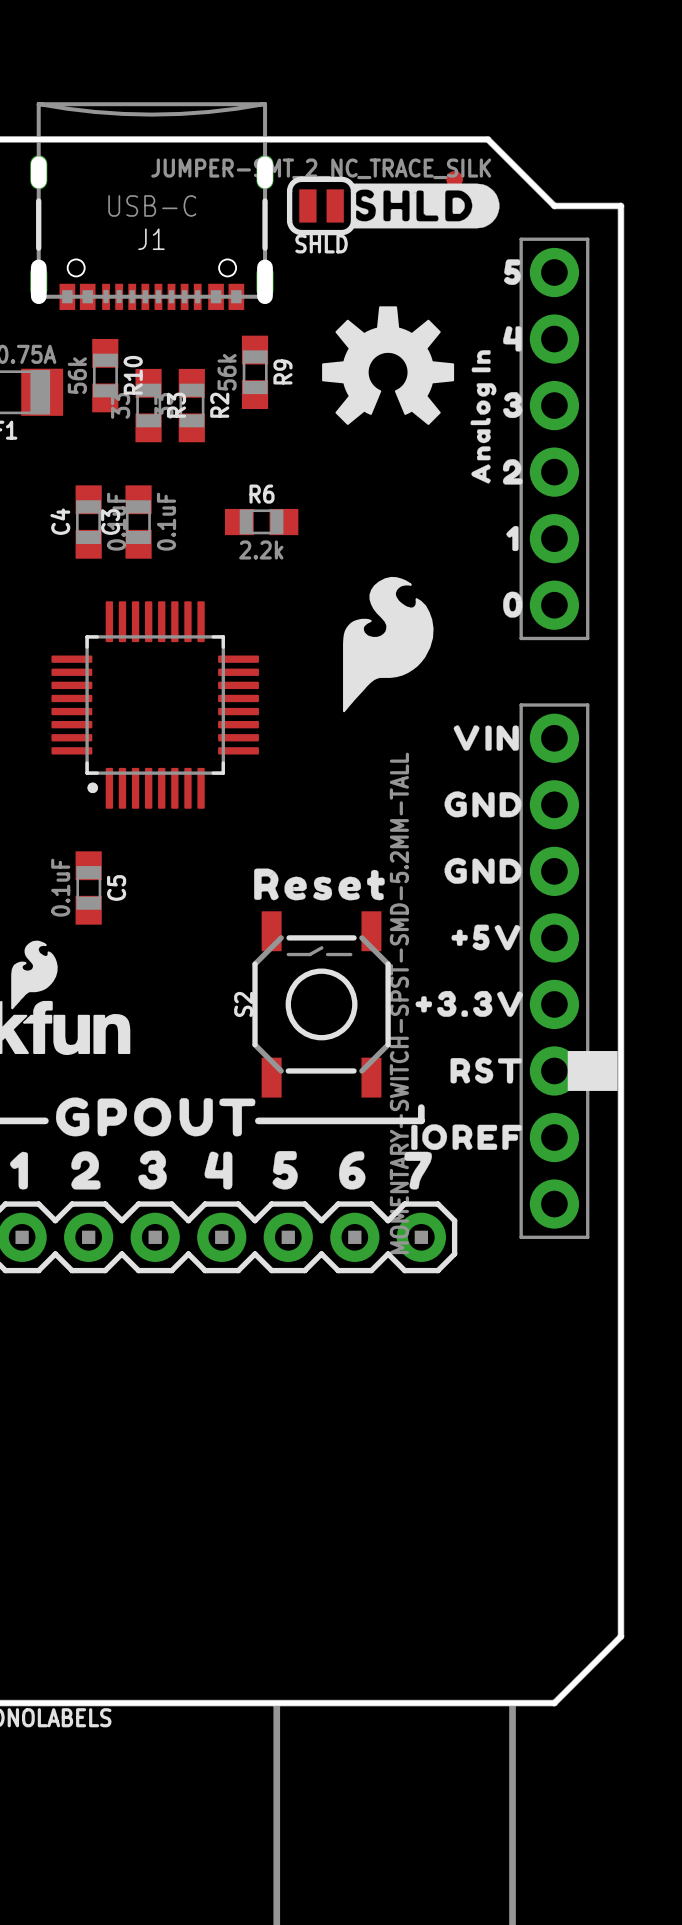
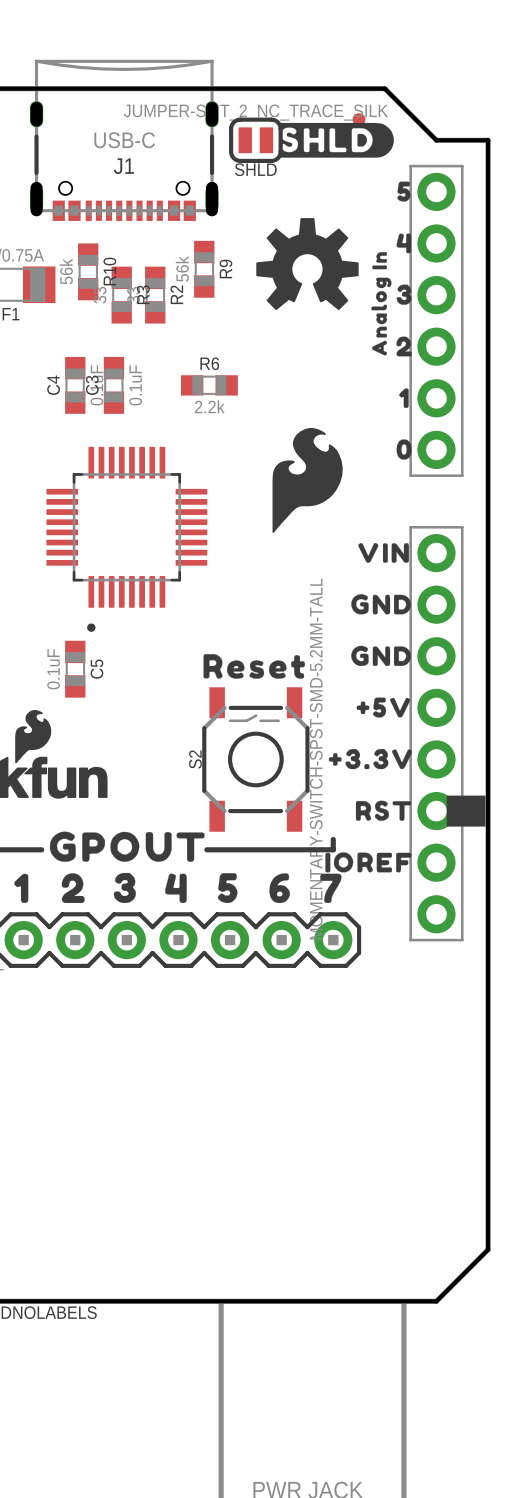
part footprint: [51, 601, 259, 809] -> [46, 446, 208, 632]

